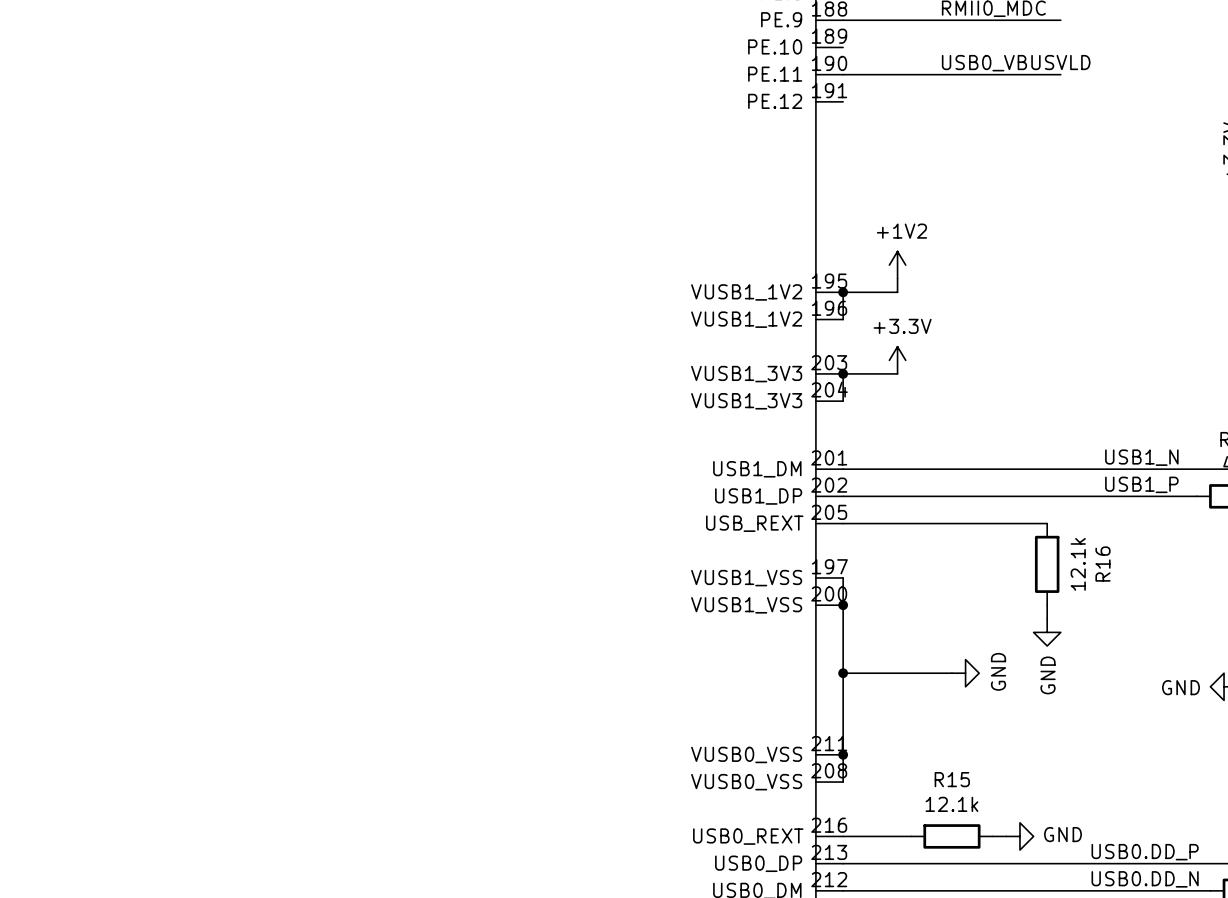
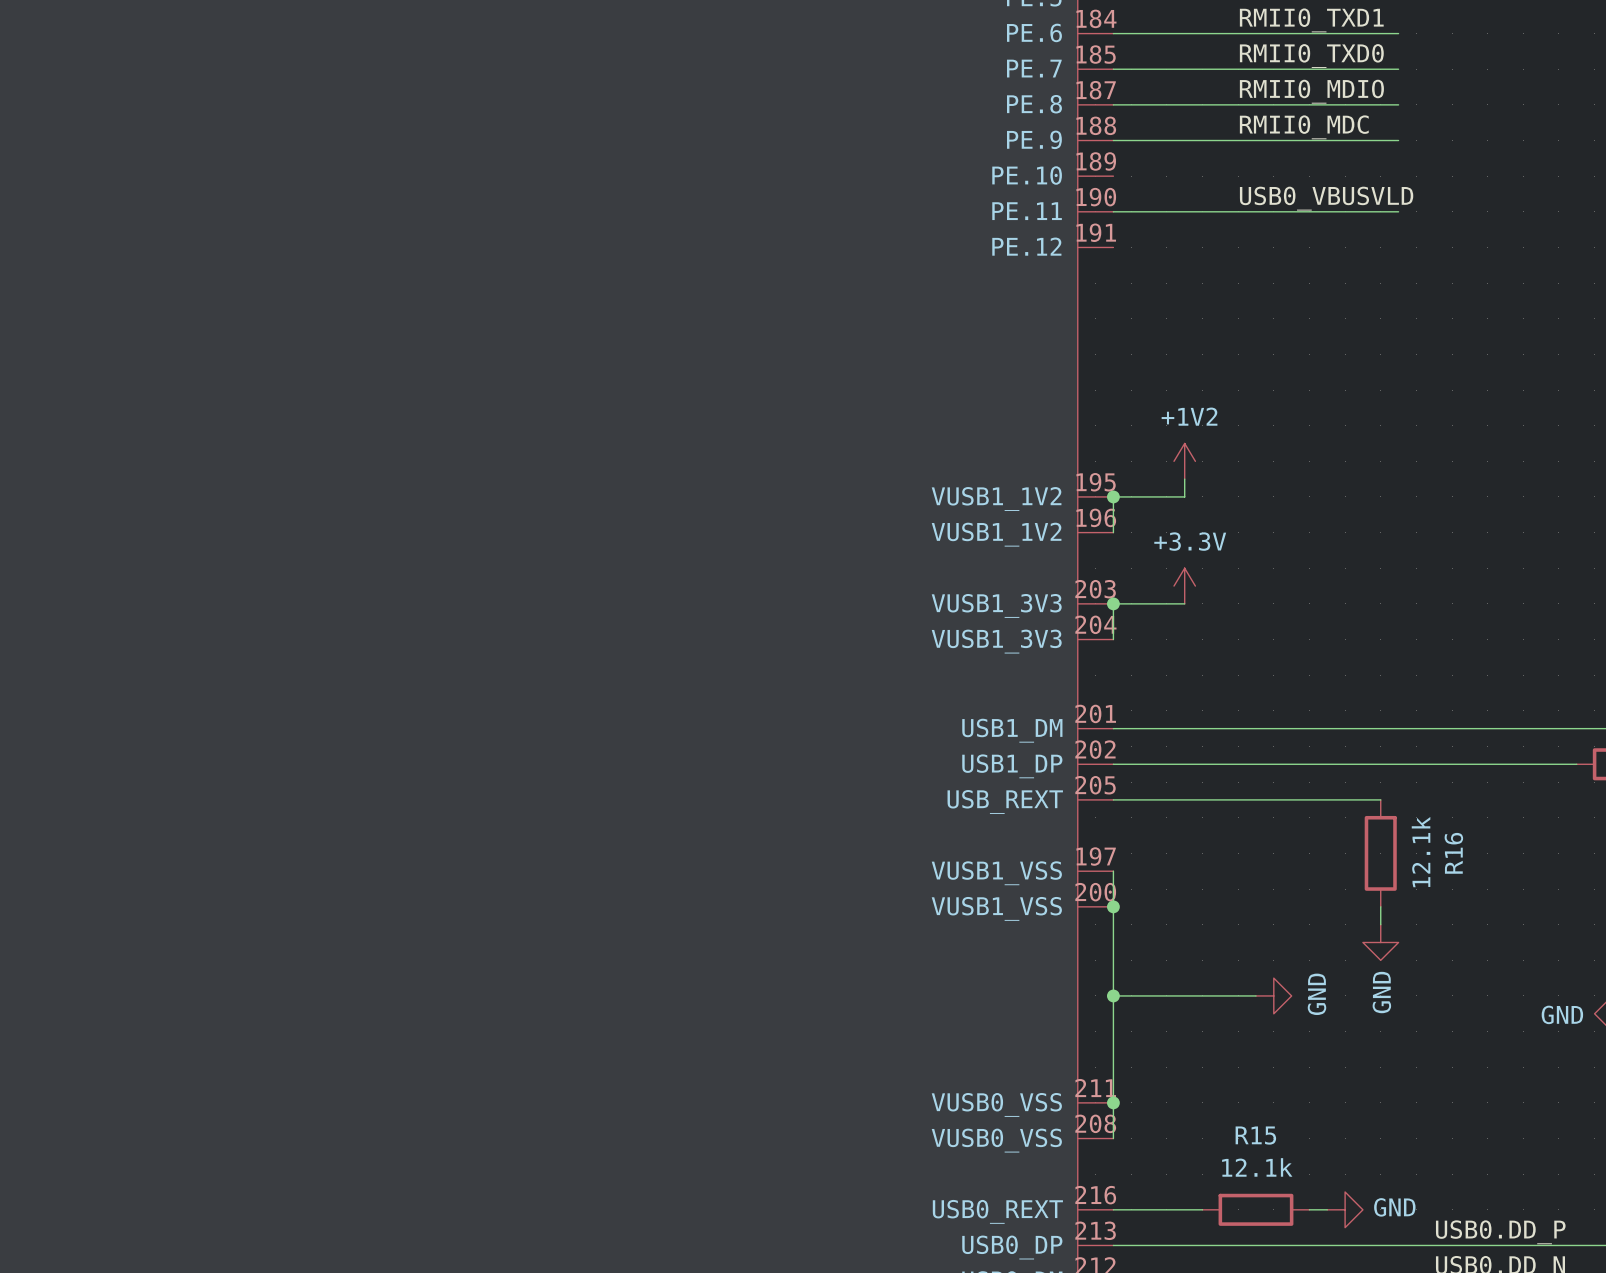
label: USB1_N (1141, 457) -> none
label: USB1_P (1141, 484) -> none

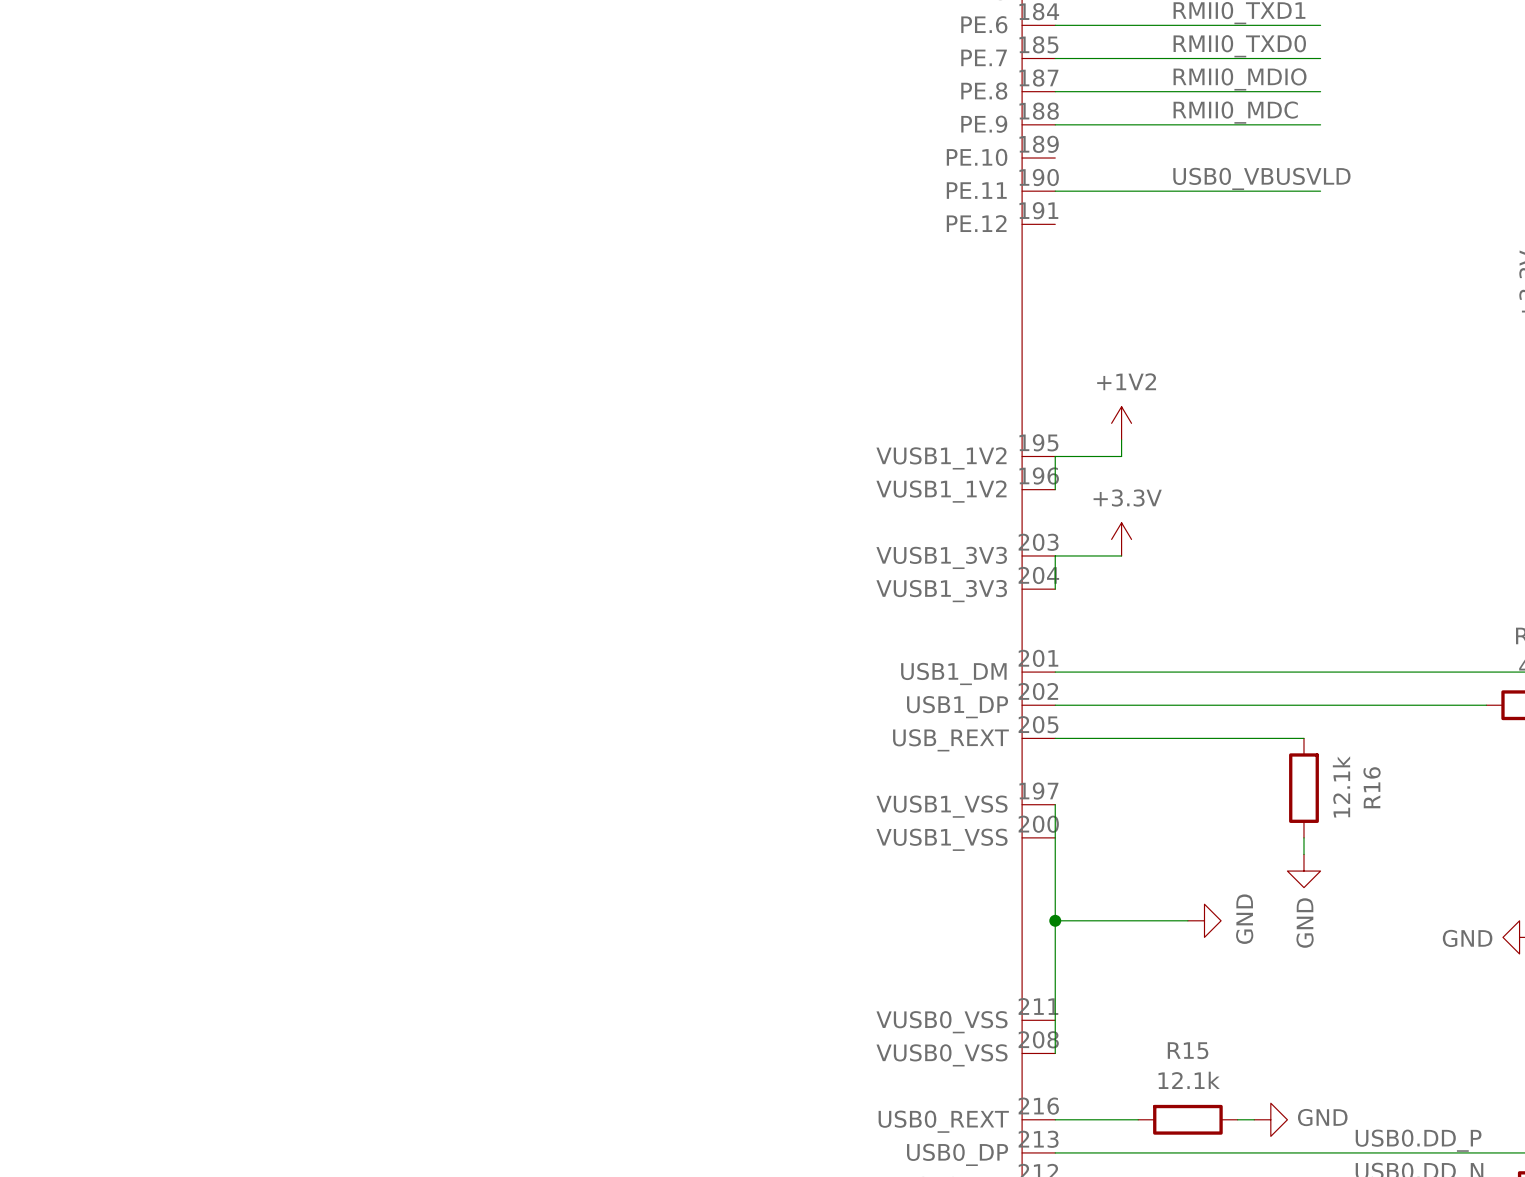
junction: (1113, 496) -> none
junction: (1113, 603) -> none
junction: (1113, 906) -> none
junction: (1113, 1102) -> none

